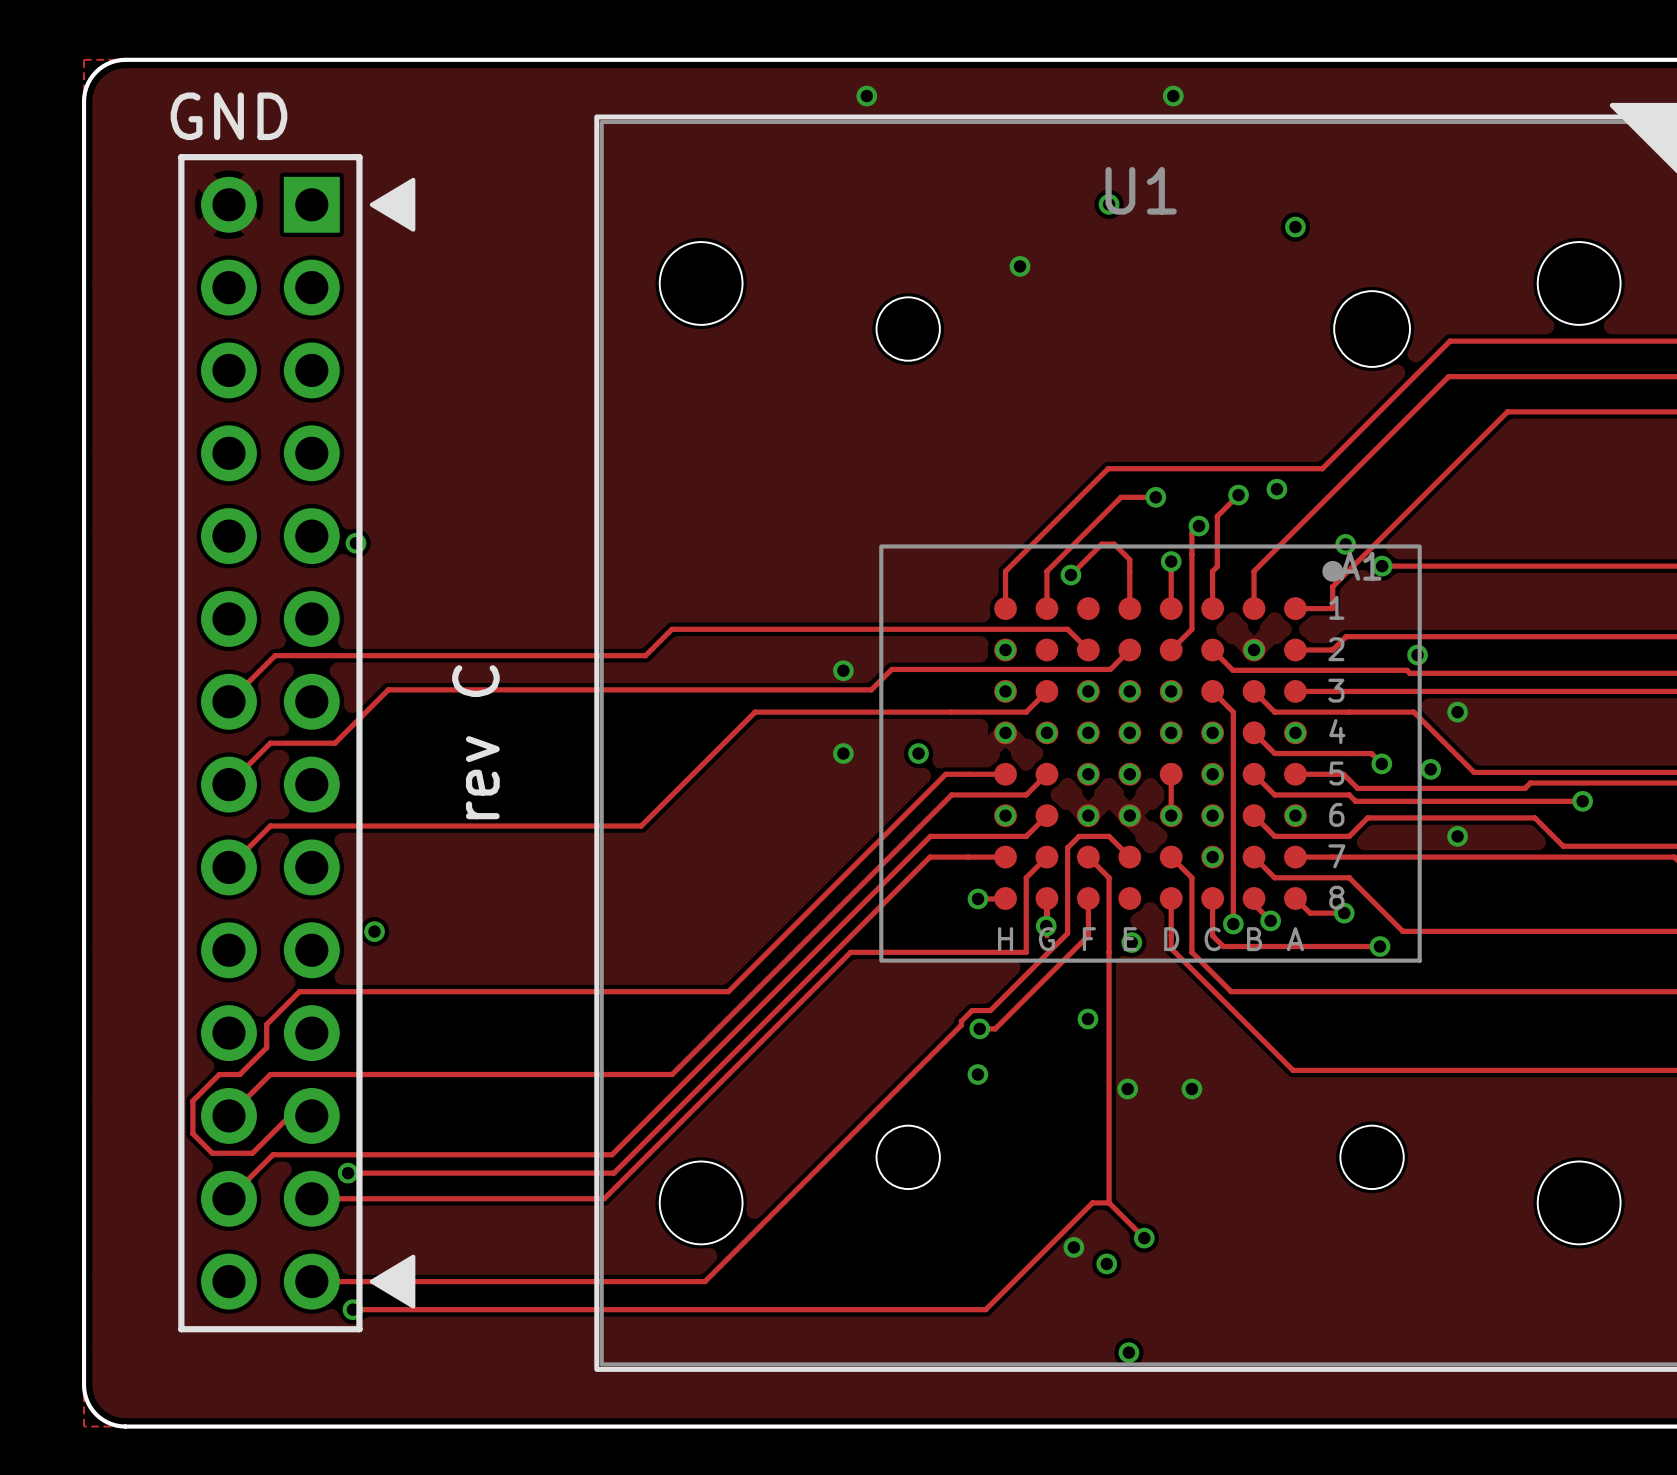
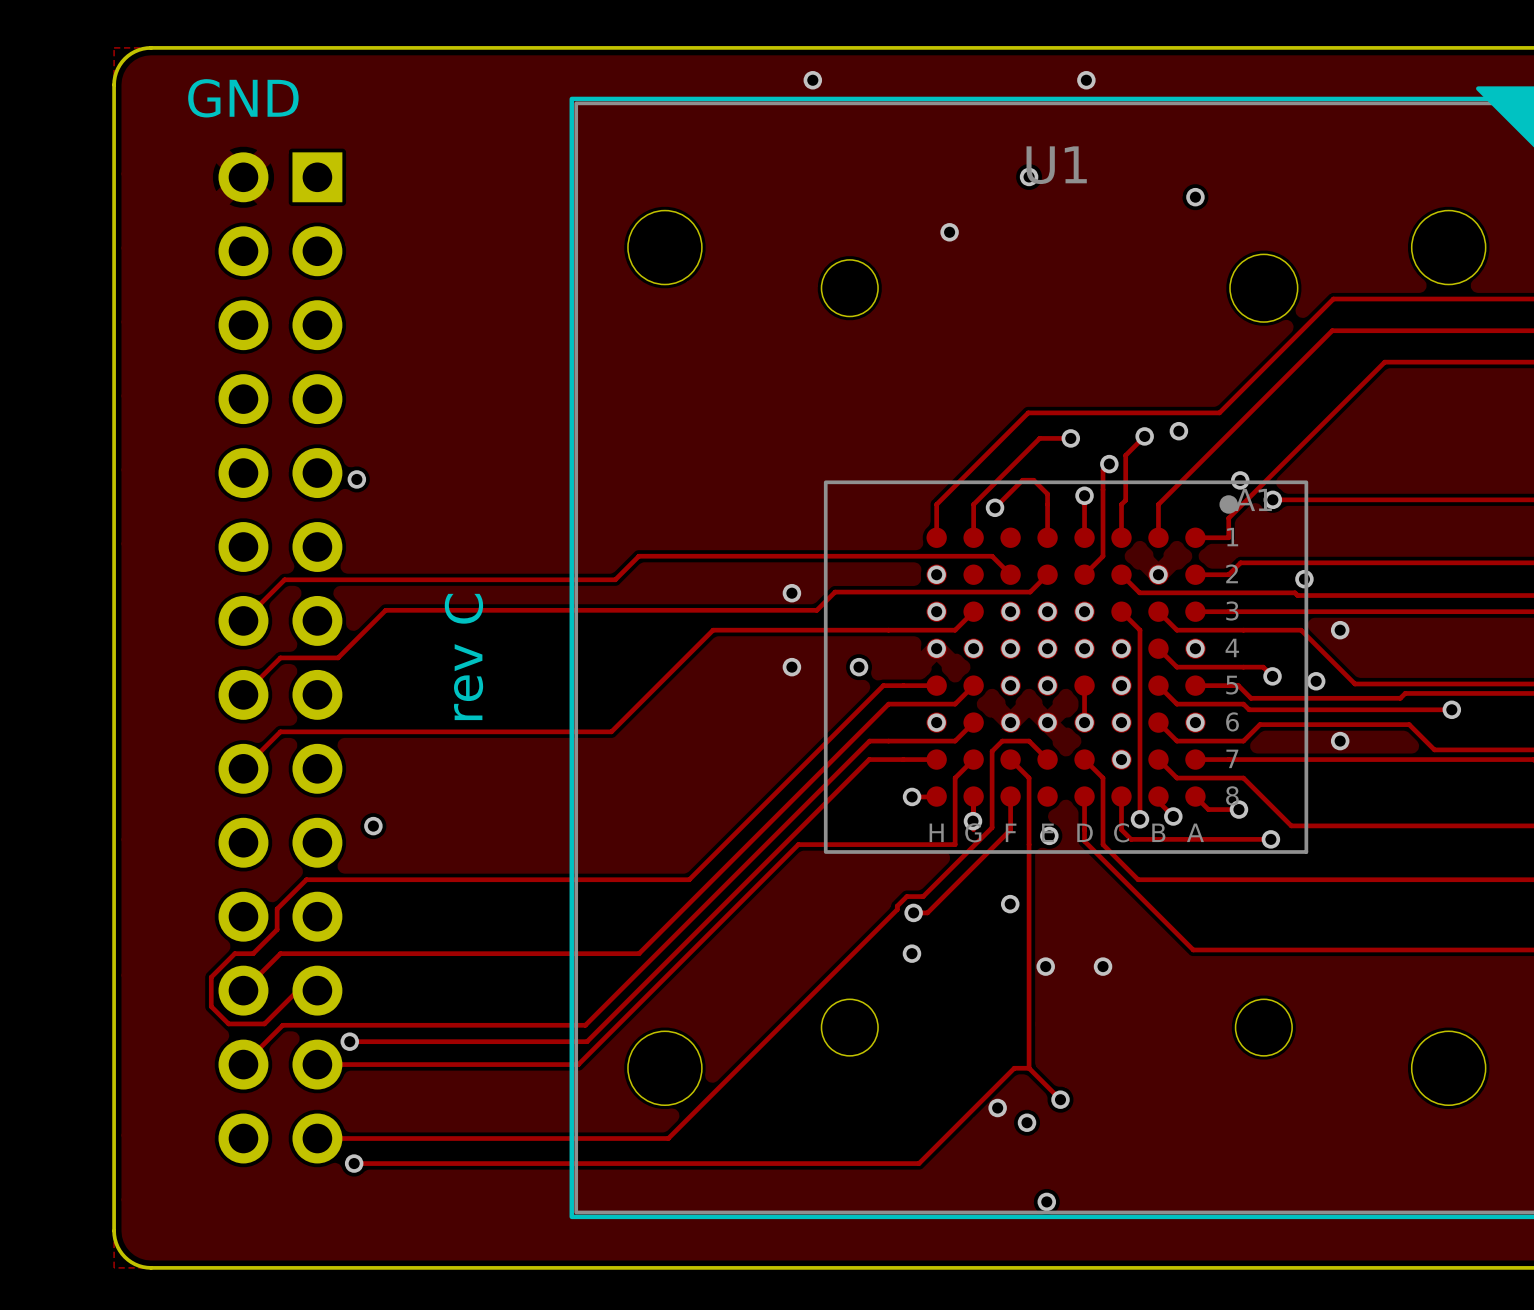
line: (181, 157) (359, 157) (359, 1329) (181, 1329) (181, 157) -> none
drawing: [369, 177, 416, 232] -> none
drawing: [369, 1254, 416, 1309] -> none

